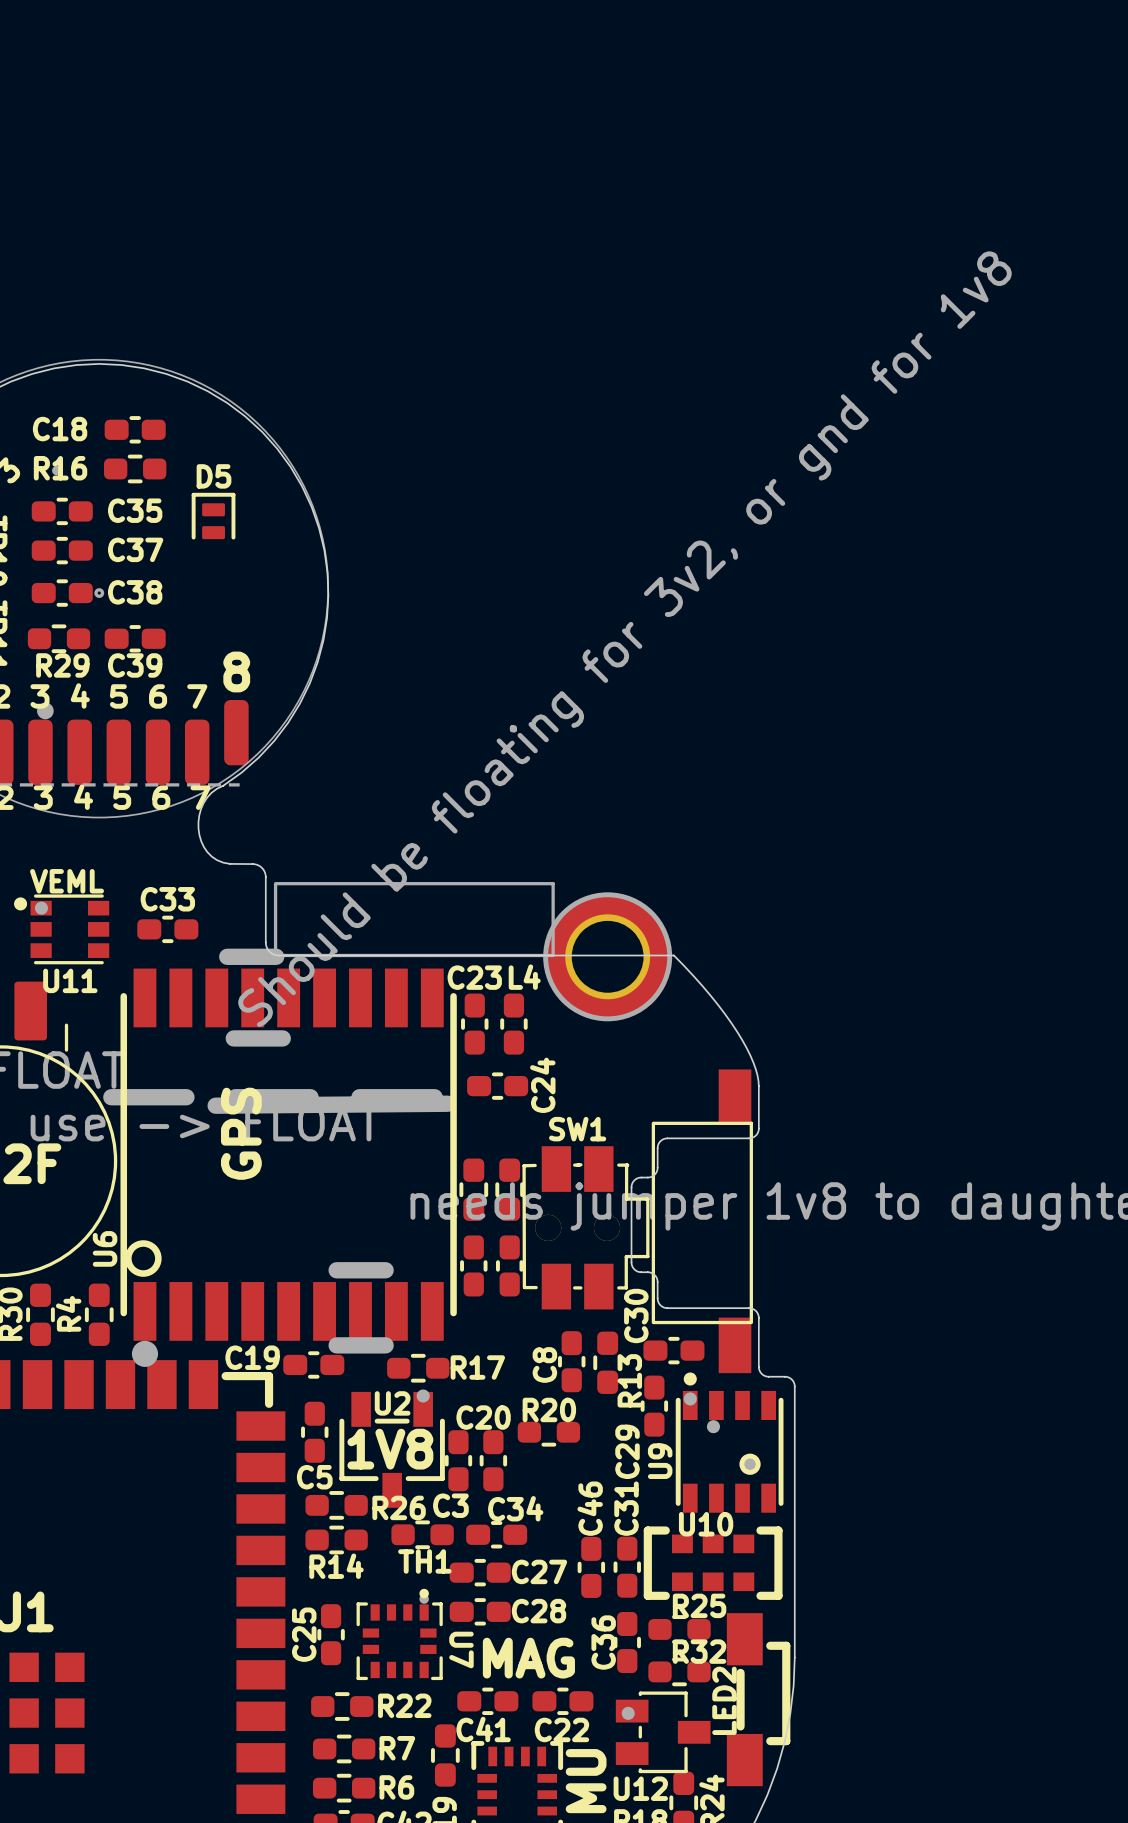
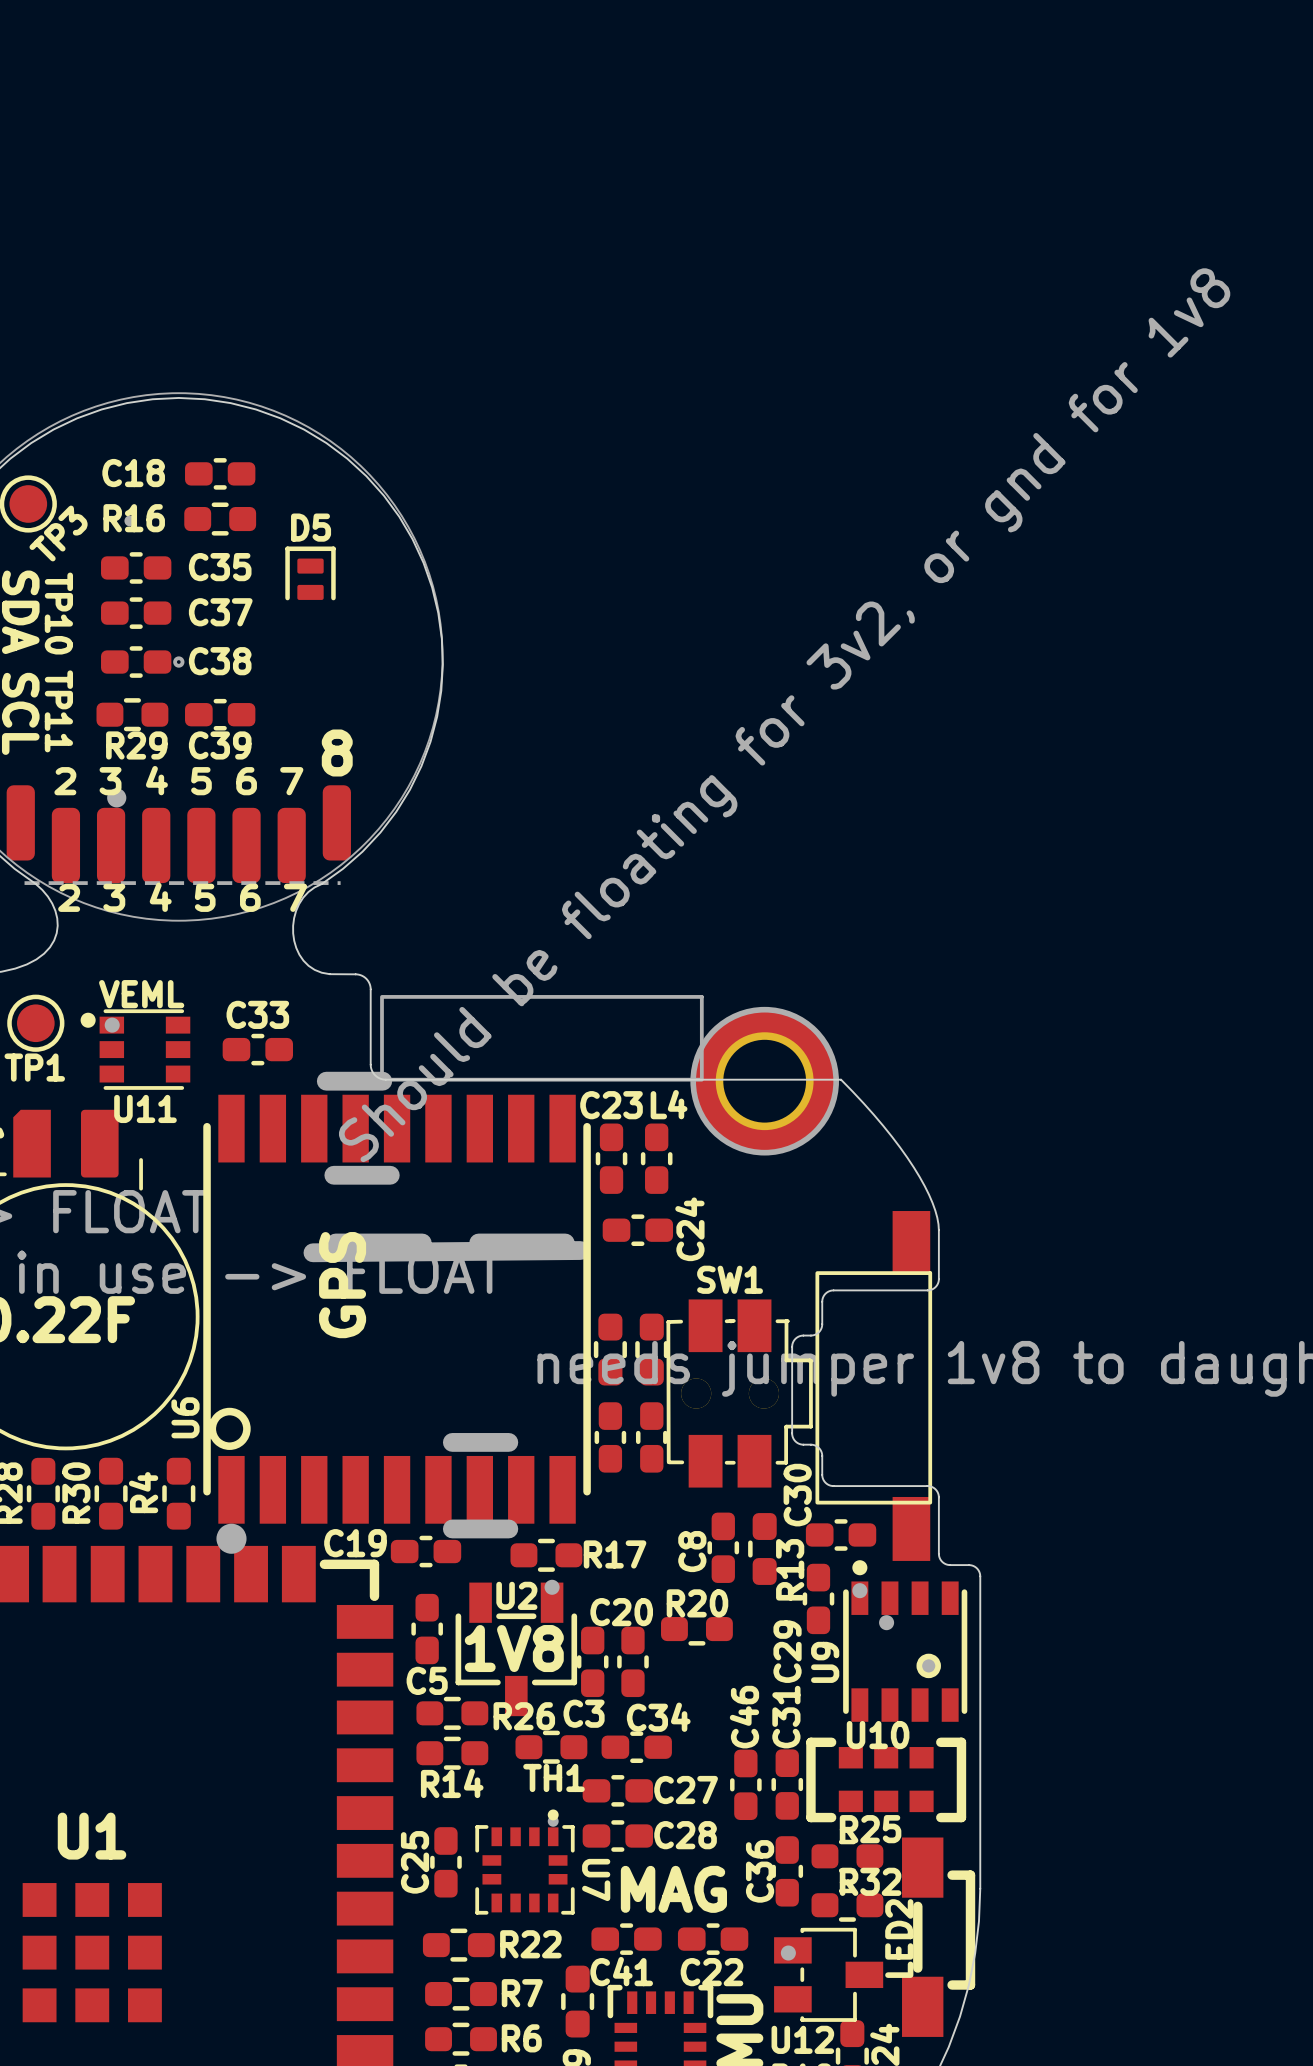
line: (111, 1097) (186, 1097) -> none

